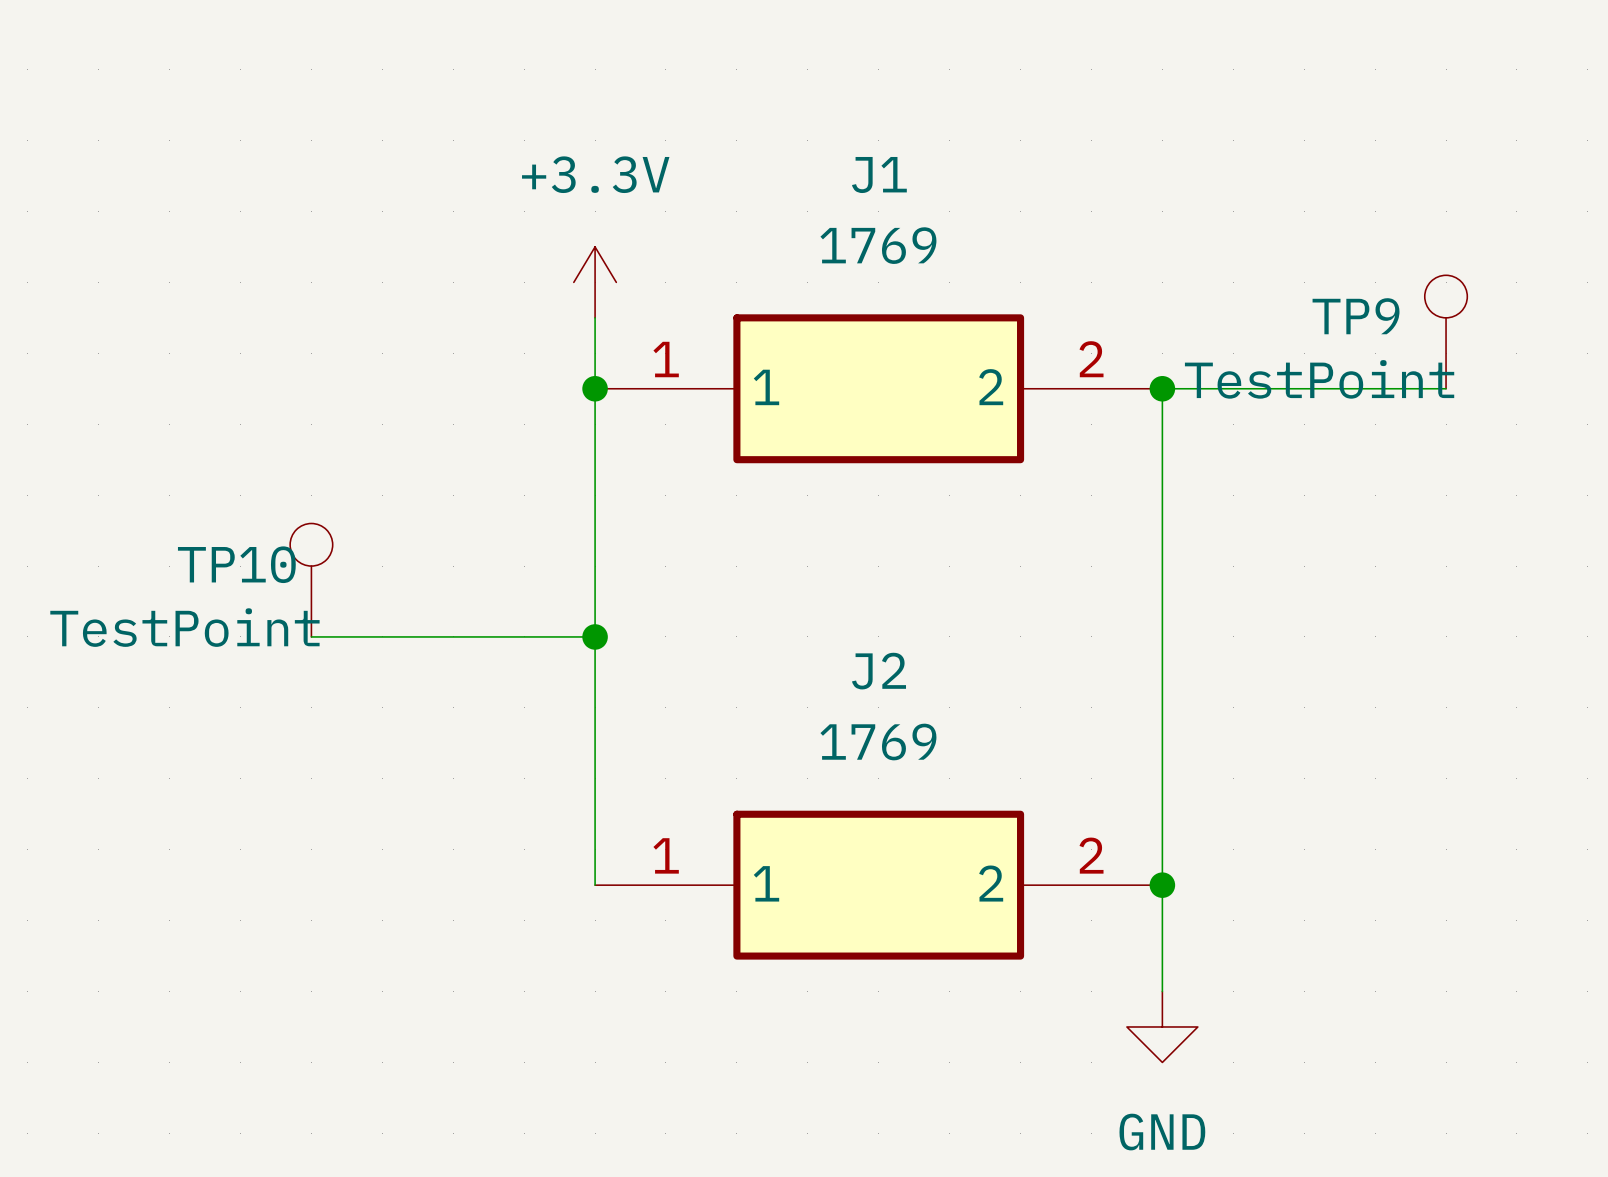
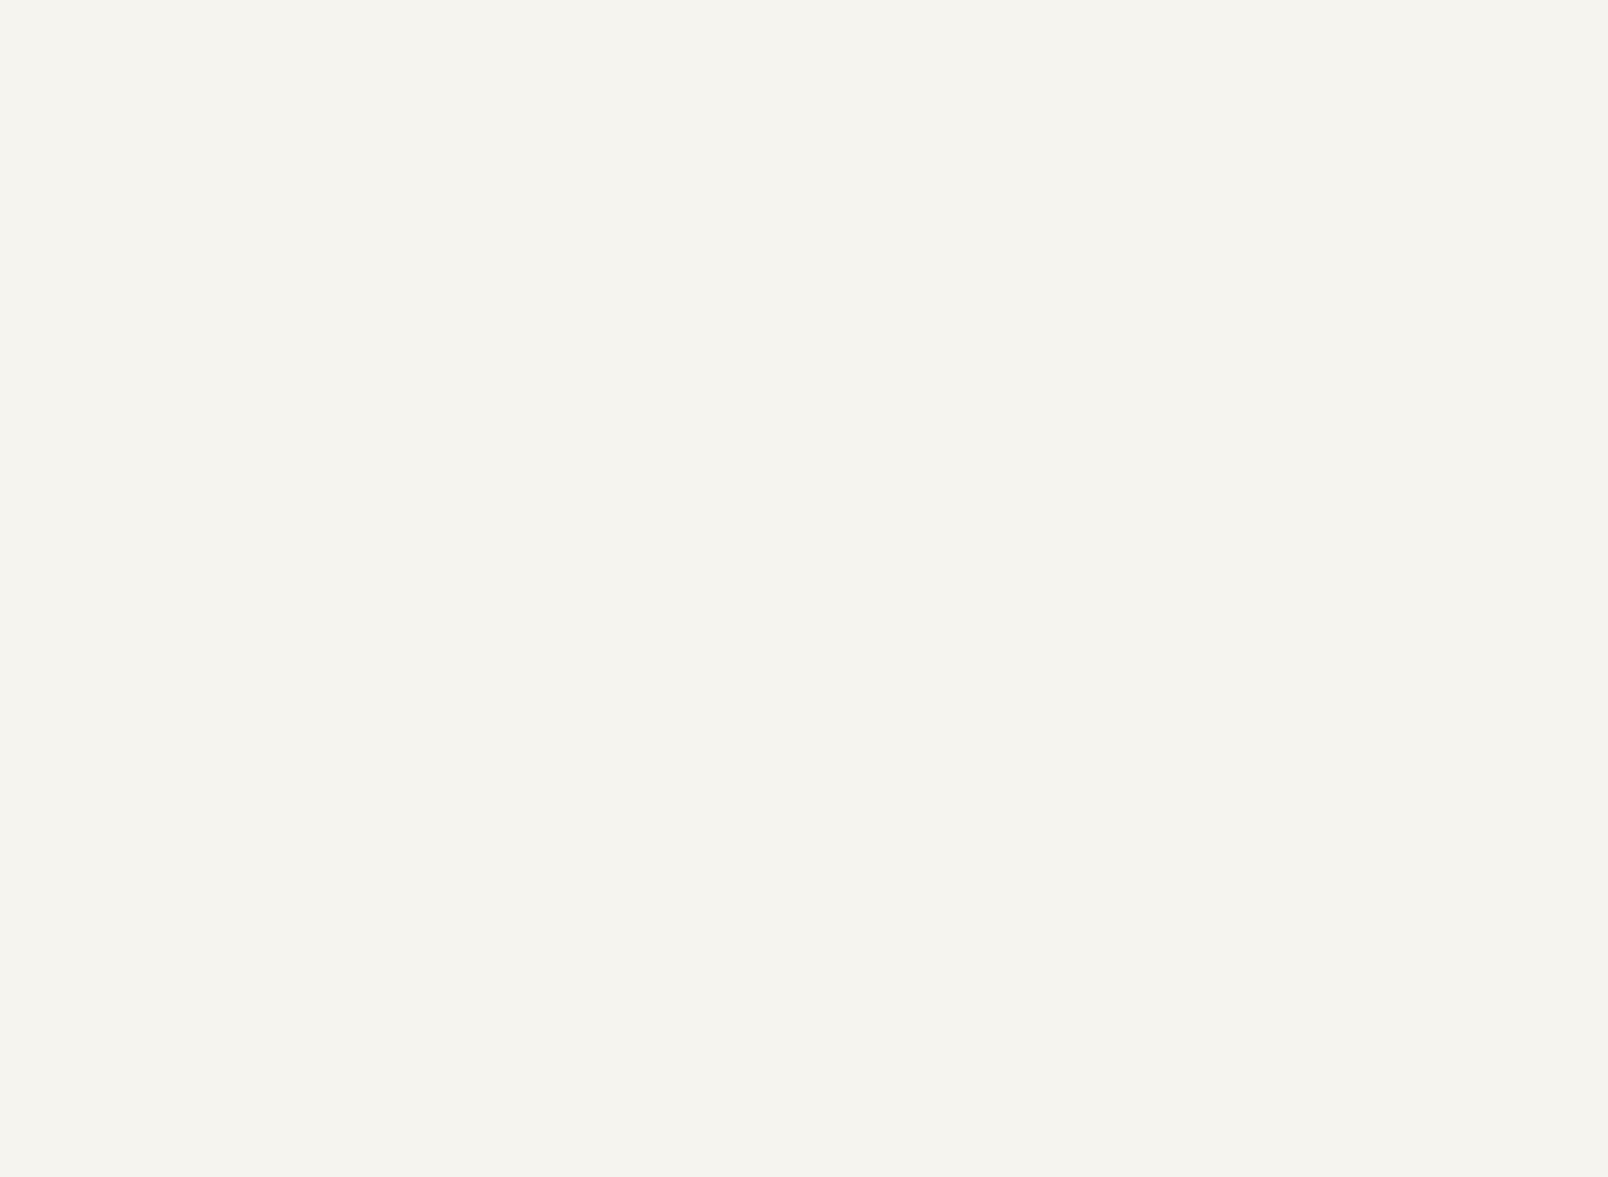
power symbol: +3.3V (595, 282) -> none
wire: (595, 317) (595, 885) -> none
TP9: TestPoint (1446, 332) -> none
junction: (595, 388) -> none
J1: 1769 (878, 388) -> none
junction: (1162, 388) -> none
wire: (1446, 388) (1162, 388) (1162, 991) -> none
TP10: TestPoint (311, 580) -> none
wire: (311, 636) (595, 636) -> none
junction: (595, 636) -> none
J2: 1769 (878, 885) -> none
junction: (1162, 885) -> none
power symbol: GND (1162, 1026) -> none

